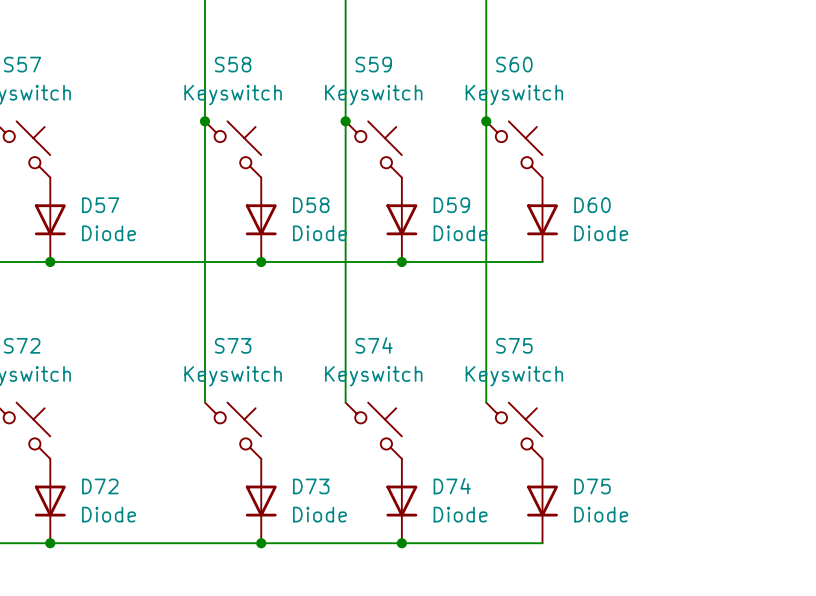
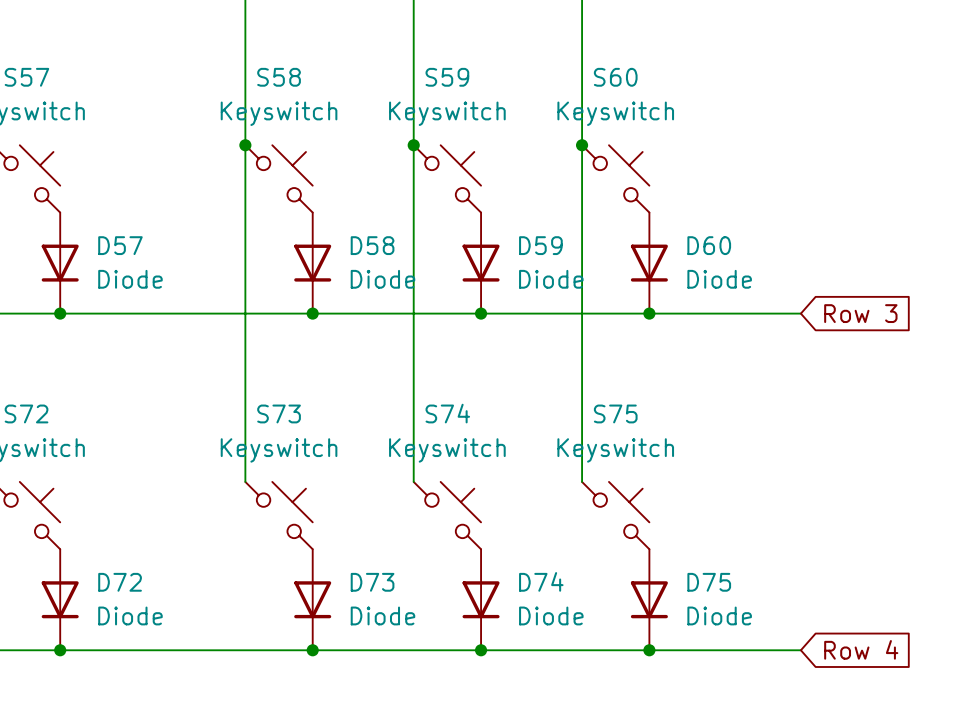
wire: none -> (649, 313) (800, 313)
junction: none -> (649, 313)
global label: none -> Row 3 (860, 313)
global label: none -> Row 4 (861, 649)
wire: none -> (649, 650) (800, 650)
junction: none -> (649, 650)

